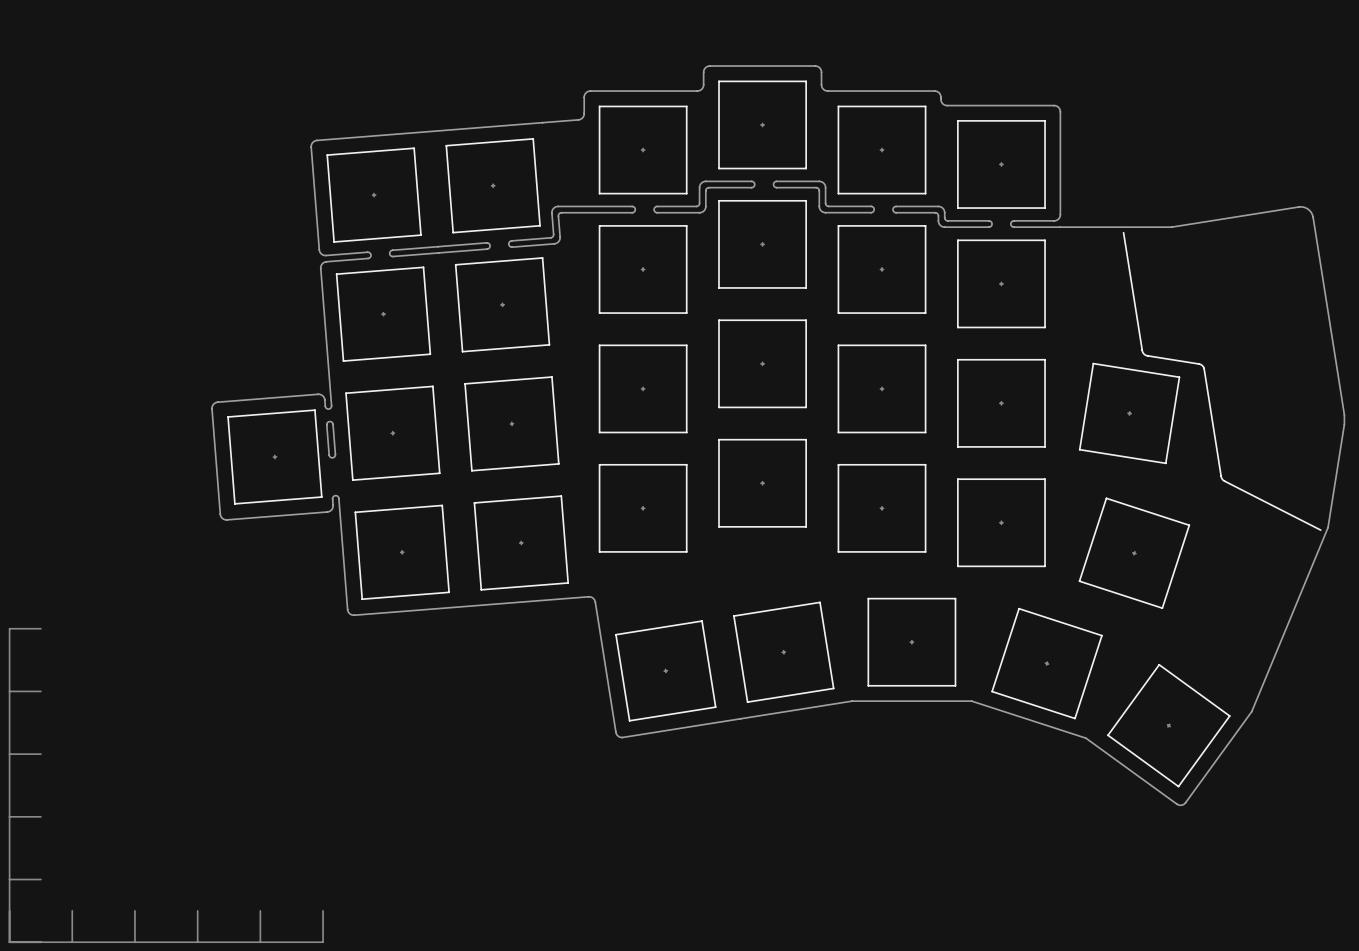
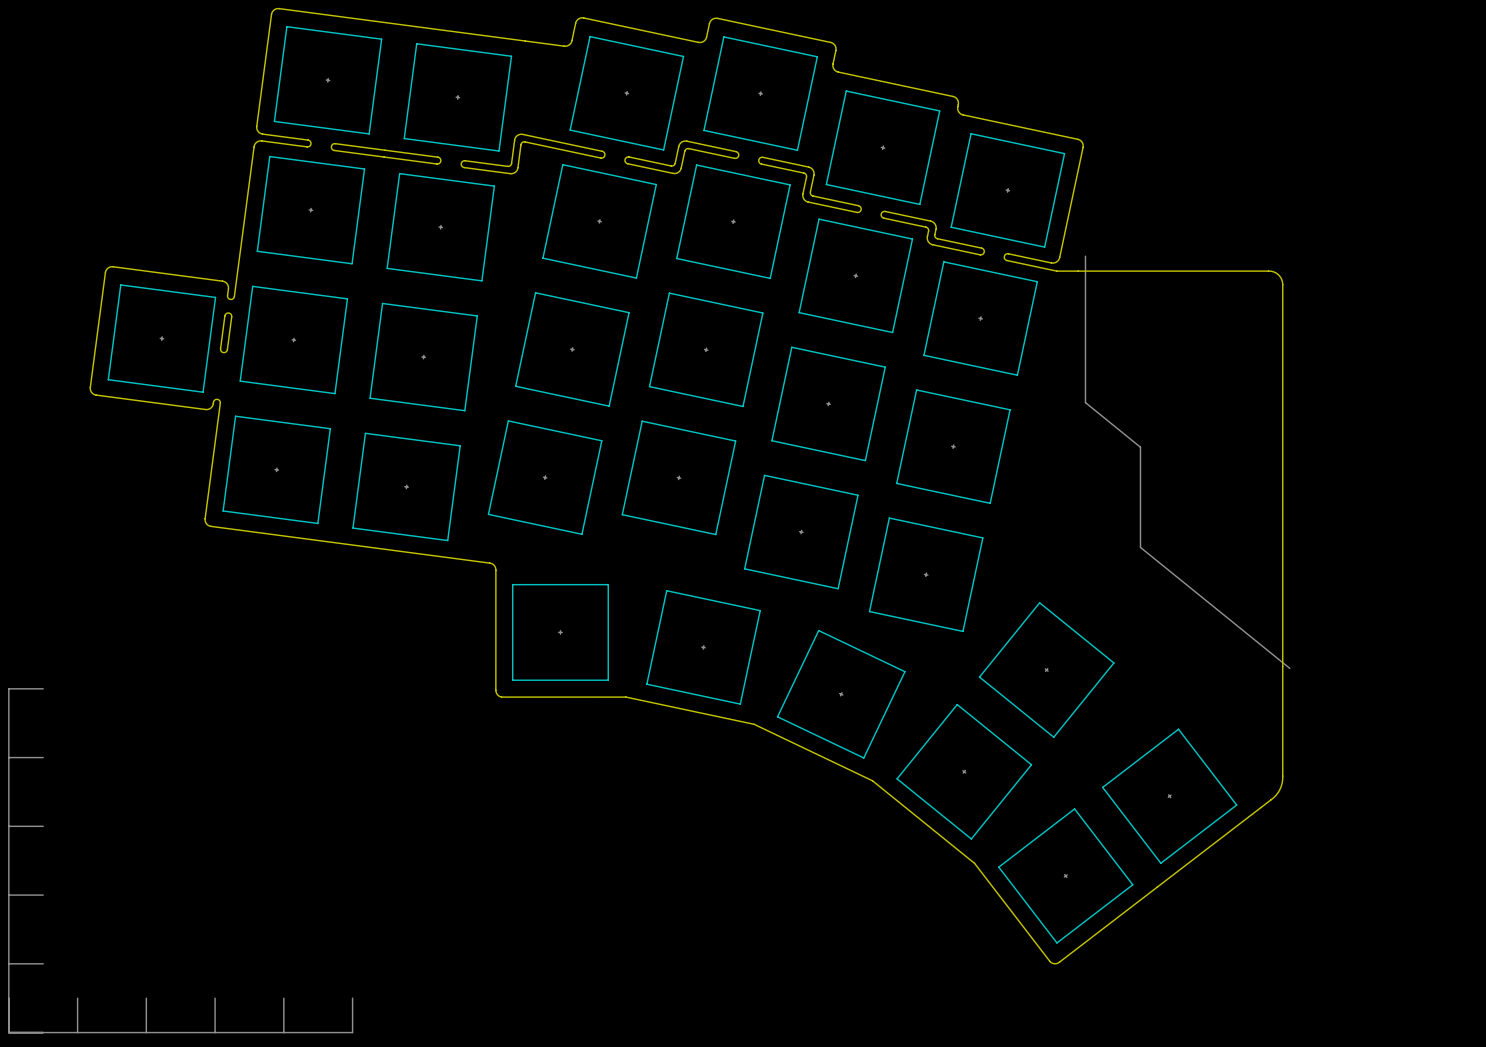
drawing: none -> [274, 26, 383, 135]
drawing: none -> [569, 36, 684, 151]
drawing: none -> [703, 36, 941, 205]
drawing: none -> [403, 43, 512, 152]
board edge: (709, 66) (816, 66) (821, 70) (821, 87) (826, 90) (935, 91) (939, 93) (941, 102) (946, 105) (1057, 106) (1060, 111) (1059, 217) (1054, 220) (1013, 220) (1010, 224) (1013, 227) (1171, 227) (1298, 207) (1305, 207) (1311, 212) (1344, 414) (1328, 527) (1251, 711) (1183, 804) (1176, 804) (1085, 738) (971, 701) (852, 701) (620, 737) (615, 732) (595, 602) (592, 597) (352, 615) (347, 609) (337, 496) (333, 497) (332, 507) (328, 511) (227, 519) (221, 517) (213, 405) (217, 402) (318, 394) (324, 397) (325, 407) (330, 408) (321, 266) (325, 261) (368, 258) (370, 255) (368, 252) (325, 255) (319, 252) (311, 147) (313, 142) (579, 119) (583, 115) (584, 96) (588, 91) (698, 90) (703, 86) (704, 69) (709, 66) -> (279, 8) (274, 9) (271, 14) (256, 129) (261, 133) (308, 140) (310, 143) (307, 146) (260, 140) (254, 144) (233, 297) (230, 299) (228, 297) (228, 286) (222, 281) (113, 266) (108, 268) (105, 272) (90, 390) (96, 395) (205, 409) (211, 407) (215, 399) (219, 400) (205, 518) (207, 525) (492, 563) (495, 569) (495, 690) (498, 695) (625, 697) (754, 724) (872, 780) (974, 863) (1049, 961) (1053, 963) (1058, 962) (1276, 795) (1281, 786) (1282, 776) (1282, 284) (1277, 273) (1270, 271) (1056, 271) (1006, 260) (1004, 256) (1007, 253) (1052, 263) (1058, 259) (1083, 147) (1081, 141) (962, 114) (958, 111) (958, 101) (953, 96) (837, 71) (832, 65) (835, 47) (830, 42) (715, 18) (710, 21) (705, 39) (699, 42) (582, 17) (576, 21) (571, 42) (565, 46) (279, 8)
drawing: [718, 81, 807, 169] -> none
drawing: [599, 106, 688, 194] -> none
drawing: [838, 106, 926, 194] -> none
drawing: [957, 120, 1046, 209] -> none
drawing: none -> [950, 133, 1065, 248]
board edge: none -> (523, 134) (602, 151) (604, 155) (600, 158) (523, 141) (520, 144) (517, 168) (513, 173) (461, 165) (461, 162) (464, 160) (509, 165) (515, 138) (518, 134) (523, 134)
board edge: none -> (686, 141) (736, 151) (738, 156) (735, 158) (687, 148) (680, 169) (674, 173) (627, 163) (625, 161) (625, 158) (628, 156) (672, 165) (679, 144) (686, 141)
board edge: none -> (335, 143) (437, 157) (440, 161) (436, 163) (334, 150) (331, 146) (335, 143)
drawing: [445, 138, 541, 233] -> none
drawing: none -> [256, 156, 365, 265]
board edge: none -> (762, 157) (810, 167) (814, 173) (811, 195) (858, 205) (860, 210) (856, 212) (806, 201) (802, 195) (805, 173) (761, 163) (758, 159) (762, 157)
drawing: [326, 147, 422, 243] -> none
drawing: none -> [542, 164, 657, 279]
drawing: none -> [676, 164, 913, 333]
drawing: none -> [386, 173, 495, 282]
board edge: (705, 181) (752, 181) (754, 184) (752, 187) (707, 188) (705, 208) (701, 212) (654, 211) (656, 206) (697, 206) (699, 186) (705, 181) -> none
board edge: (776, 181) (820, 181) (825, 186) (827, 205) (871, 206) (874, 210) (871, 212) (823, 212) (819, 208) (817, 188) (776, 187) (773, 184) (776, 181) -> none
board edge: none -> (885, 211) (931, 221) (935, 225) (936, 238) (981, 248) (984, 252) (980, 254) (931, 244) (927, 240) (927, 227) (883, 218) (881, 214) (882, 211) (883, 211) (885, 211)
drawing: [718, 200, 807, 289] -> none
board edge: (558, 206) (632, 206) (635, 209) (632, 212) (560, 212) (558, 215) (560, 237) (557, 242) (509, 246) (508, 243) (511, 240) (552, 237) (552, 211) (558, 206) -> none
board edge: (896, 206) (939, 206) (943, 209) (946, 220) (989, 220) (992, 224) (988, 227) (943, 227) (939, 224) (936, 212) (895, 212) (892, 209) (896, 206) -> none
drawing: [599, 225, 688, 314] -> none
drawing: [838, 225, 926, 314] -> none
line: (1123, 232) (1142, 352) (1147, 355) (1199, 364) (1203, 367) (1222, 479) (1320, 530) -> none
line: none -> (1085, 256) (1085, 402) (1140, 447) (1140, 547) (1289, 668)
drawing: none -> [923, 261, 1038, 376]
drawing: [957, 239, 1046, 328] -> none
board edge: (486, 242) (392, 250) (389, 253) (393, 256) (487, 249) (490, 245) (486, 242) -> none
drawing: [455, 257, 550, 353] -> none
drawing: none -> [107, 284, 216, 393]
drawing: none -> [239, 285, 348, 395]
drawing: [336, 266, 431, 362] -> none
drawing: none -> [515, 292, 630, 407]
drawing: none -> [649, 292, 886, 462]
drawing: none -> [369, 303, 478, 412]
board edge: none -> (224, 316) (220, 349) (223, 352) (227, 350) (231, 316) (228, 313) (224, 316)
drawing: [718, 319, 807, 408] -> none
drawing: [599, 344, 688, 433] -> none
drawing: [838, 344, 926, 433] -> none
drawing: none -> [896, 389, 1011, 504]
drawing: [957, 359, 1046, 448] -> none
drawing: [1079, 363, 1180, 464] -> none
drawing: [464, 376, 560, 472] -> none
drawing: none -> [222, 415, 331, 524]
drawing: none -> [488, 420, 603, 535]
drawing: none -> [621, 420, 859, 705]
drawing: [345, 386, 441, 481] -> none
drawing: none -> [352, 432, 461, 541]
drawing: [227, 409, 323, 505] -> none
board edge: (333, 424) (335, 454) (332, 457) (329, 455) (326, 424) (330, 421) (333, 424) -> none
drawing: [718, 439, 807, 528] -> none
drawing: [599, 464, 688, 553] -> none
drawing: [838, 464, 926, 553] -> none
drawing: none -> [777, 517, 1238, 944]
drawing: [957, 478, 1046, 567] -> none
drawing: [474, 495, 569, 591] -> none
drawing: [991, 497, 1231, 787] -> none
drawing: [354, 505, 450, 600] -> none
drawing: none -> [512, 584, 609, 681]
drawing: [867, 598, 956, 687] -> none
drawing: [733, 602, 835, 703] -> none
drawing: [615, 620, 717, 722] -> none

